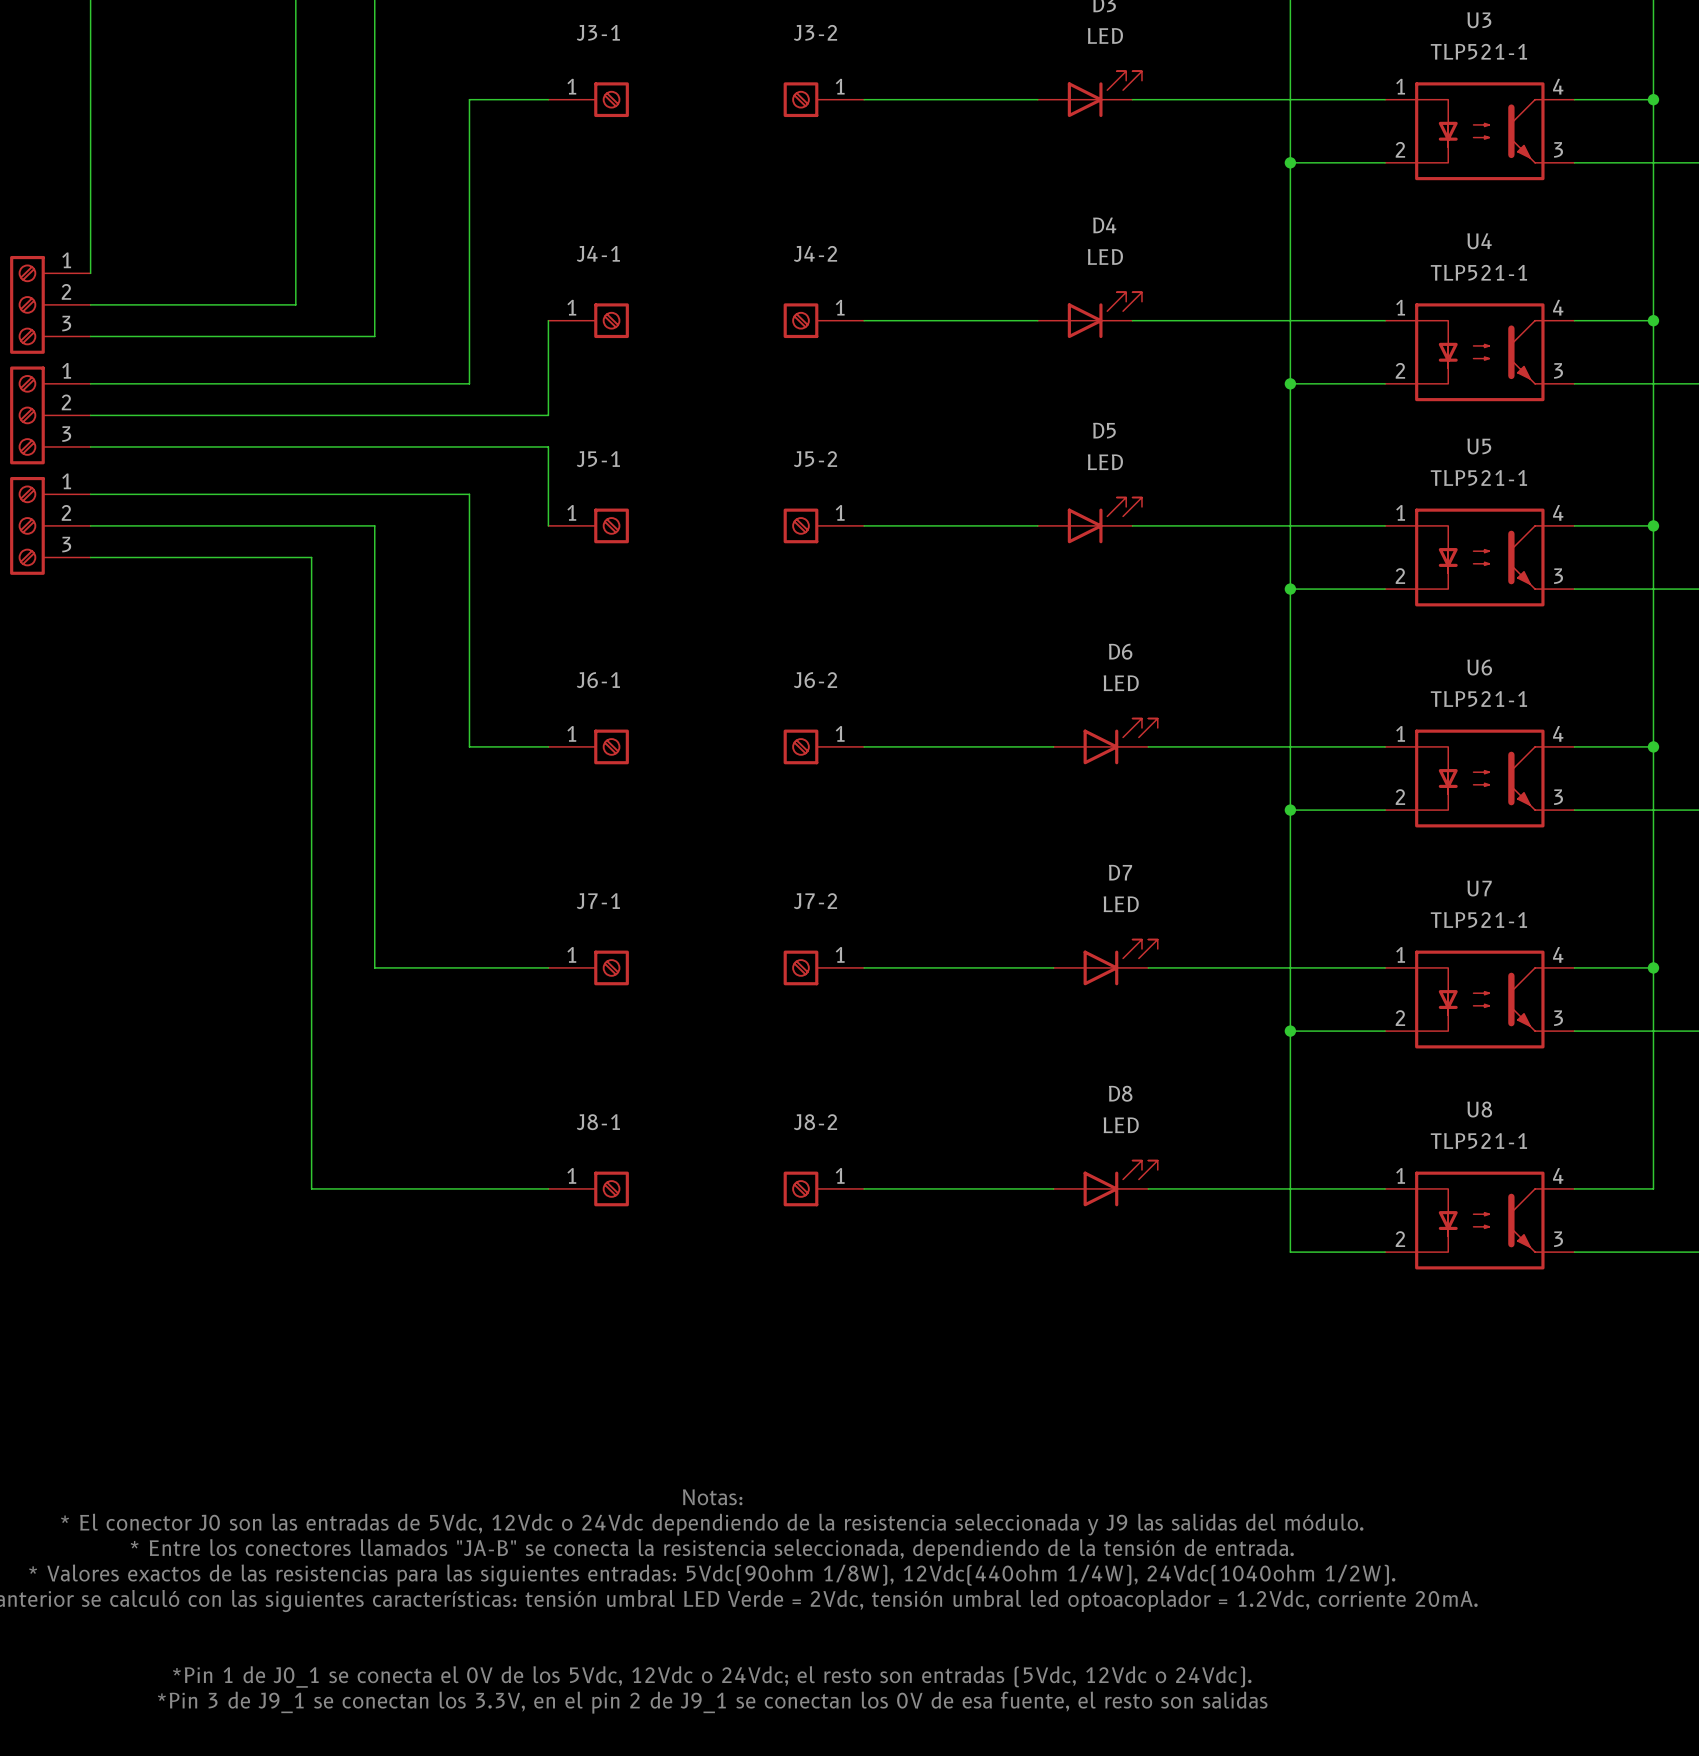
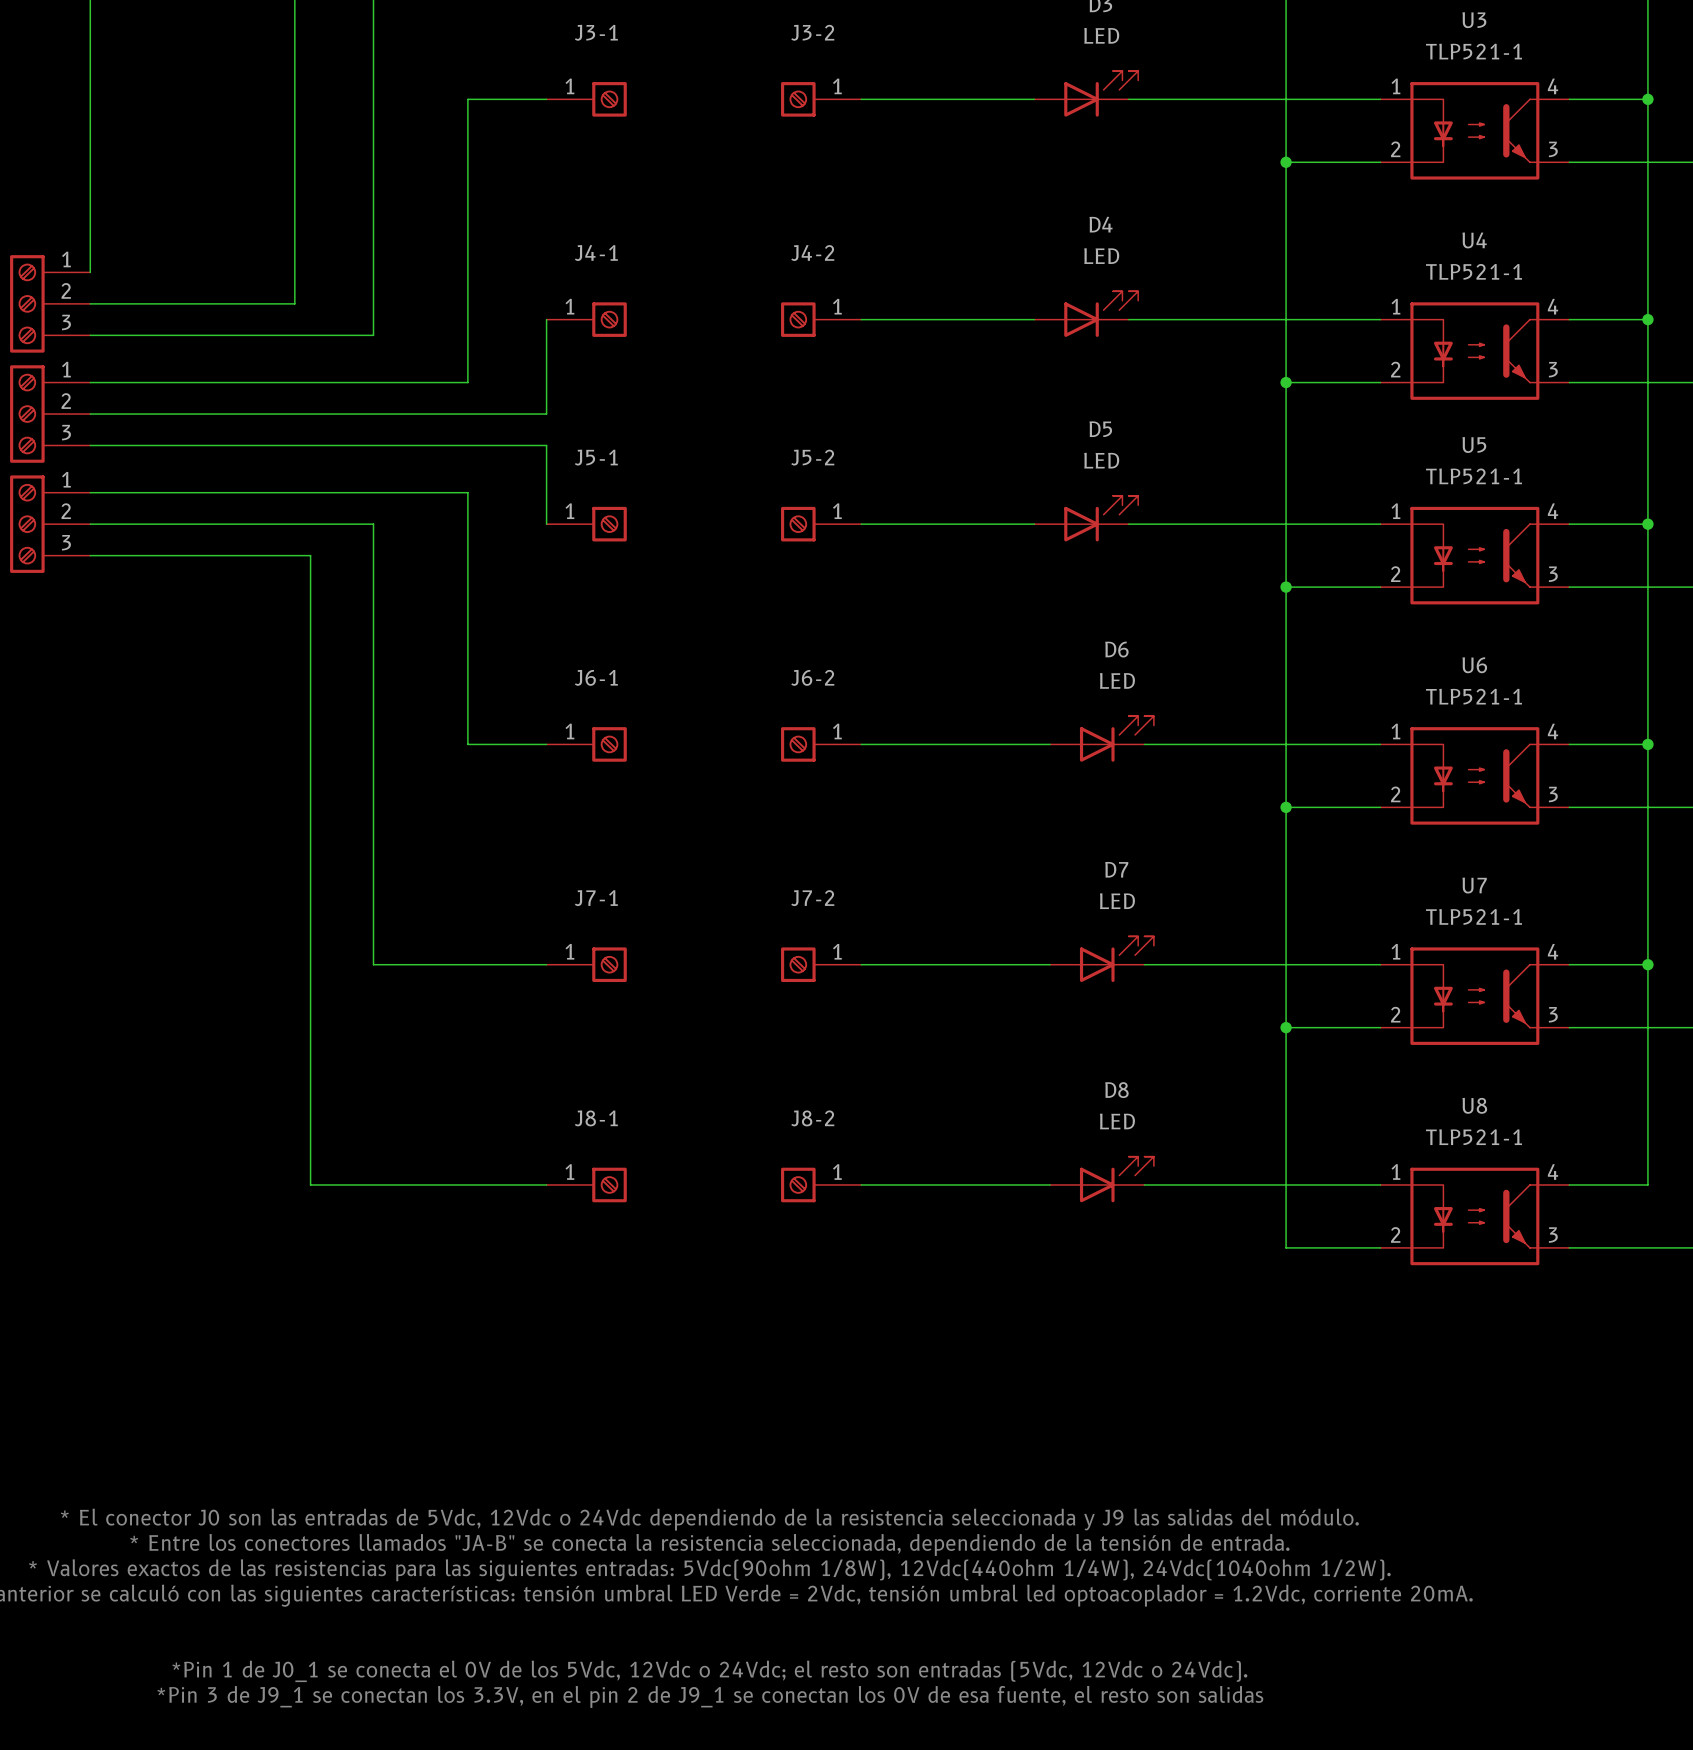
text: Notas: (712, 1497) -> none

